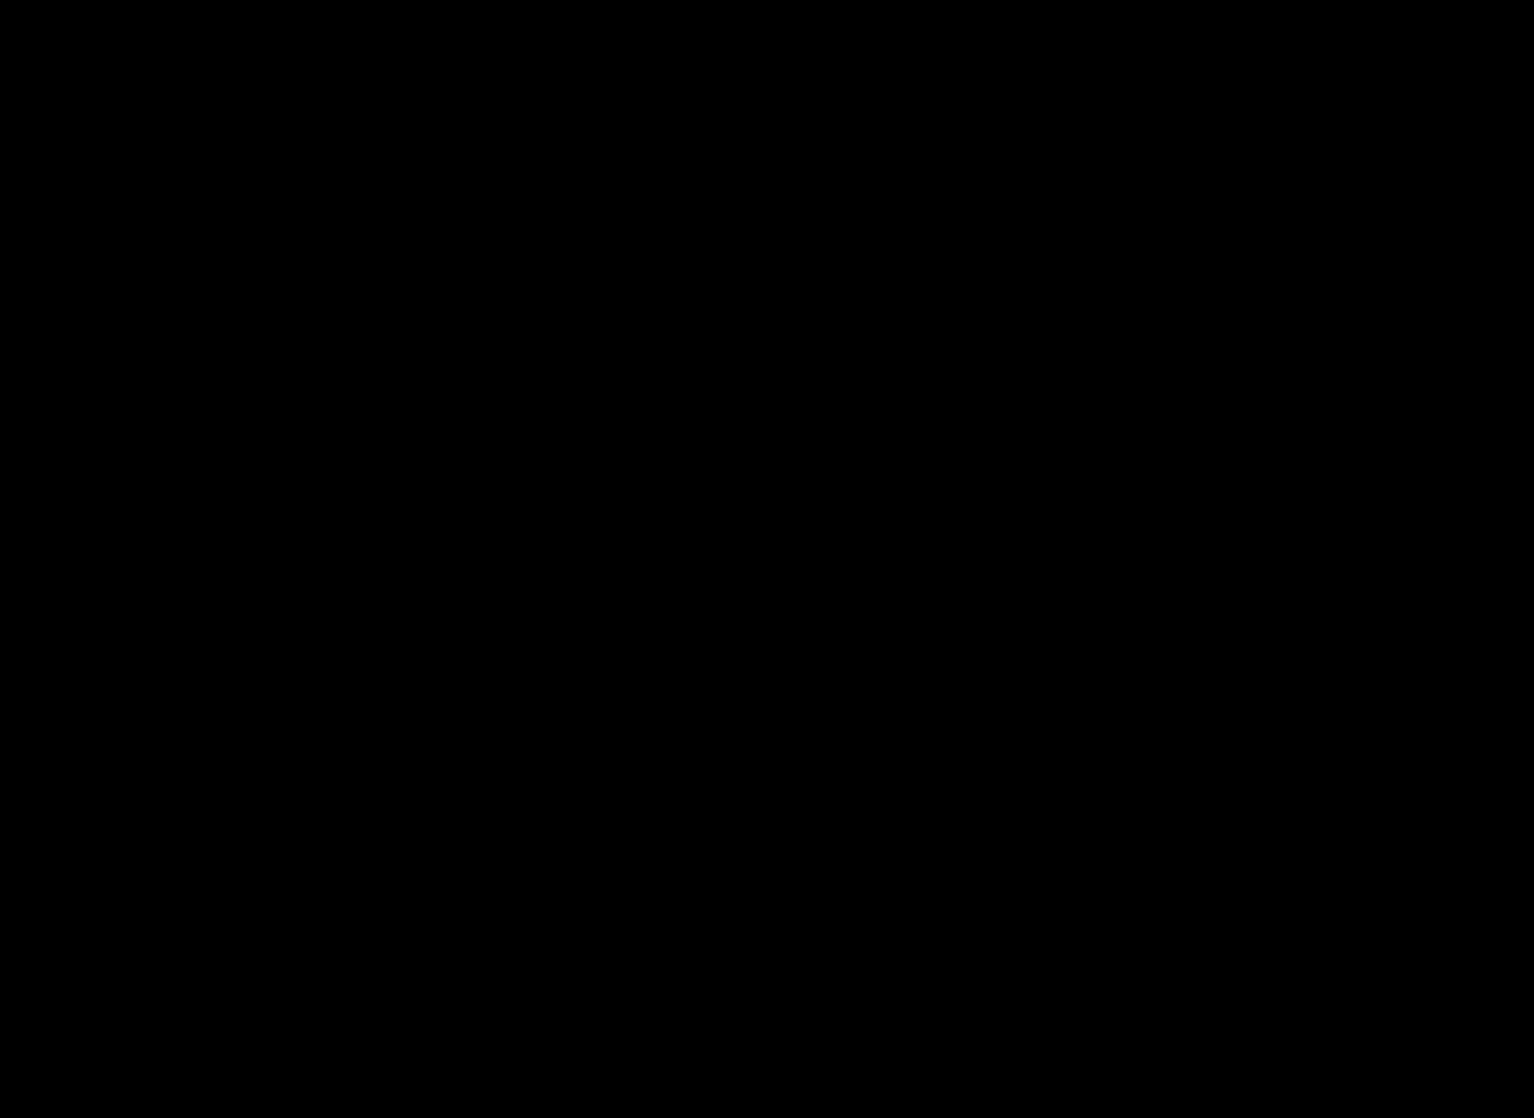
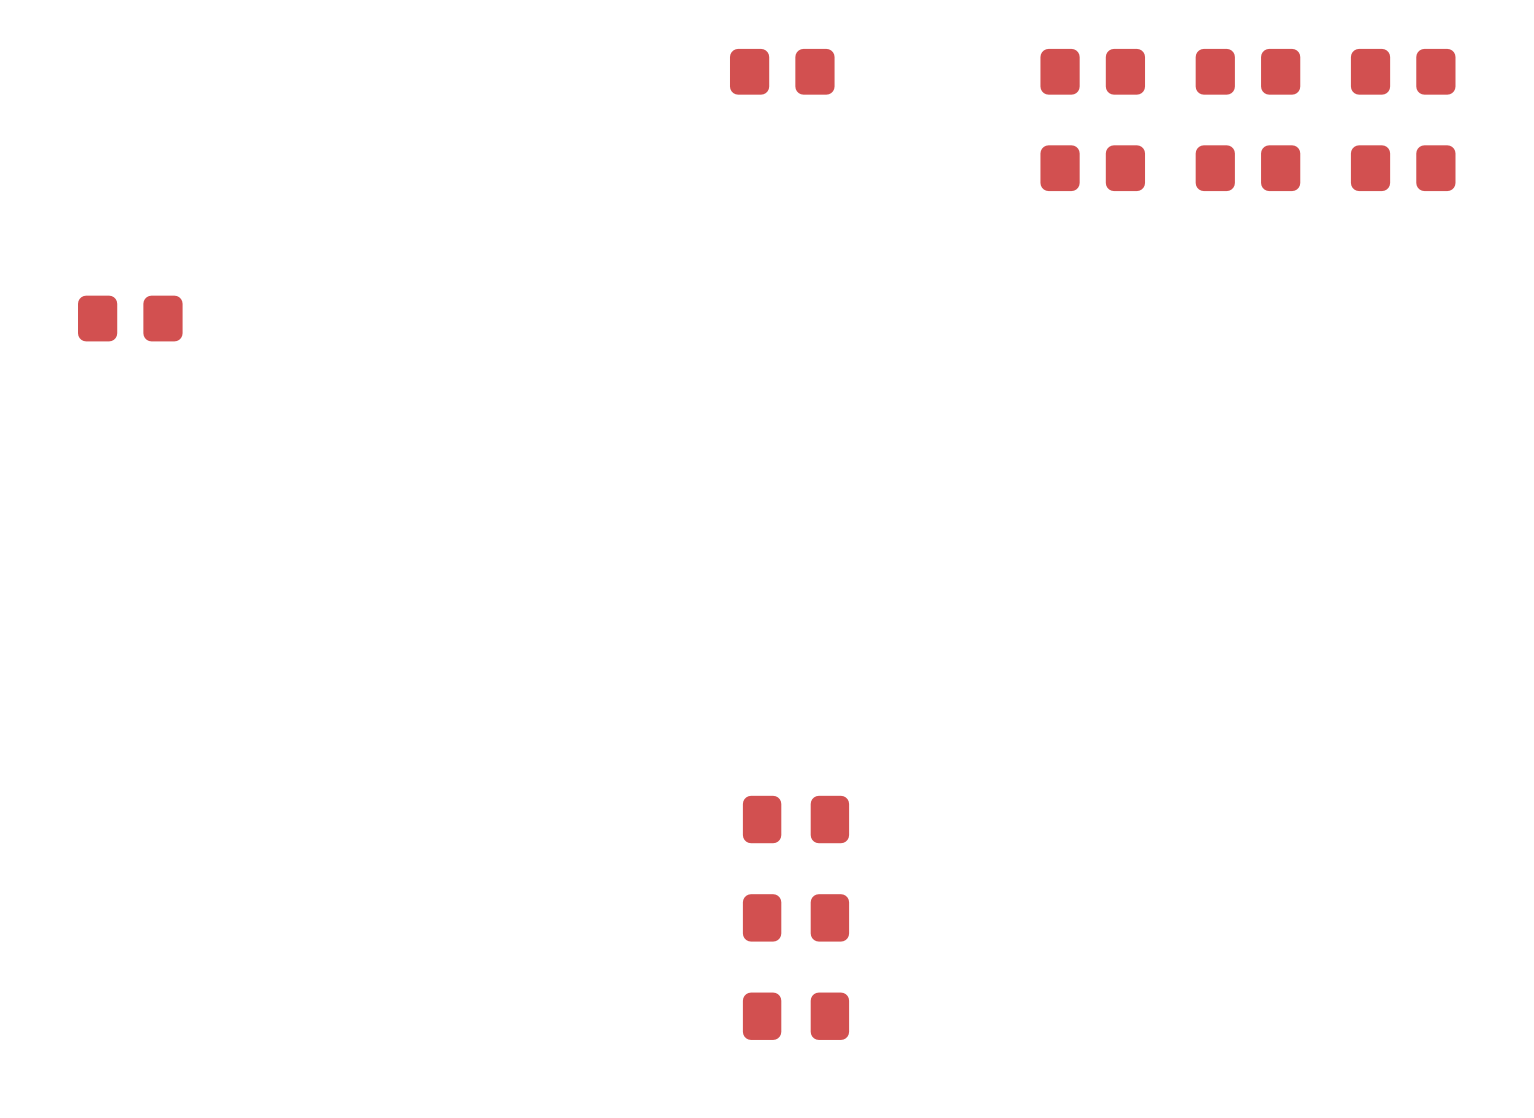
part: none -> (782, 71)
part: none -> (1092, 71)
part: none -> (1247, 71)
part: none -> (1403, 71)
part: none -> (1092, 168)
part: none -> (1247, 168)
part: none -> (1403, 168)
part: none -> (130, 318)
part: none -> (796, 819)
part: none -> (796, 917)
part: none -> (796, 1016)

